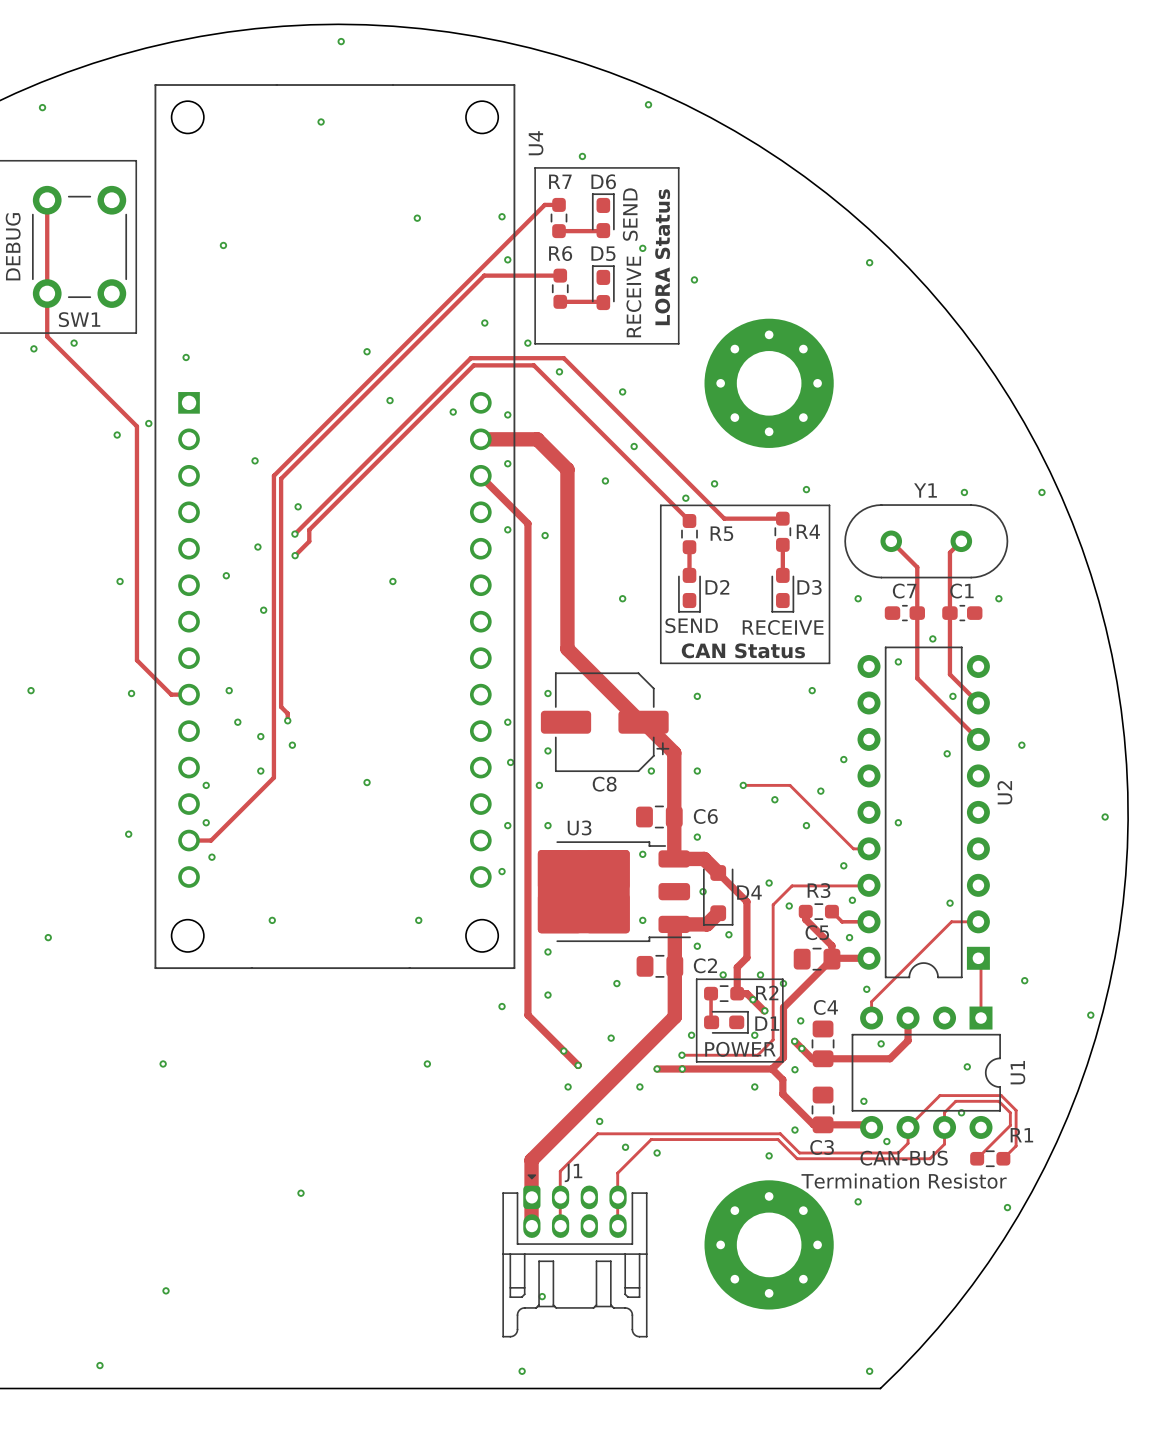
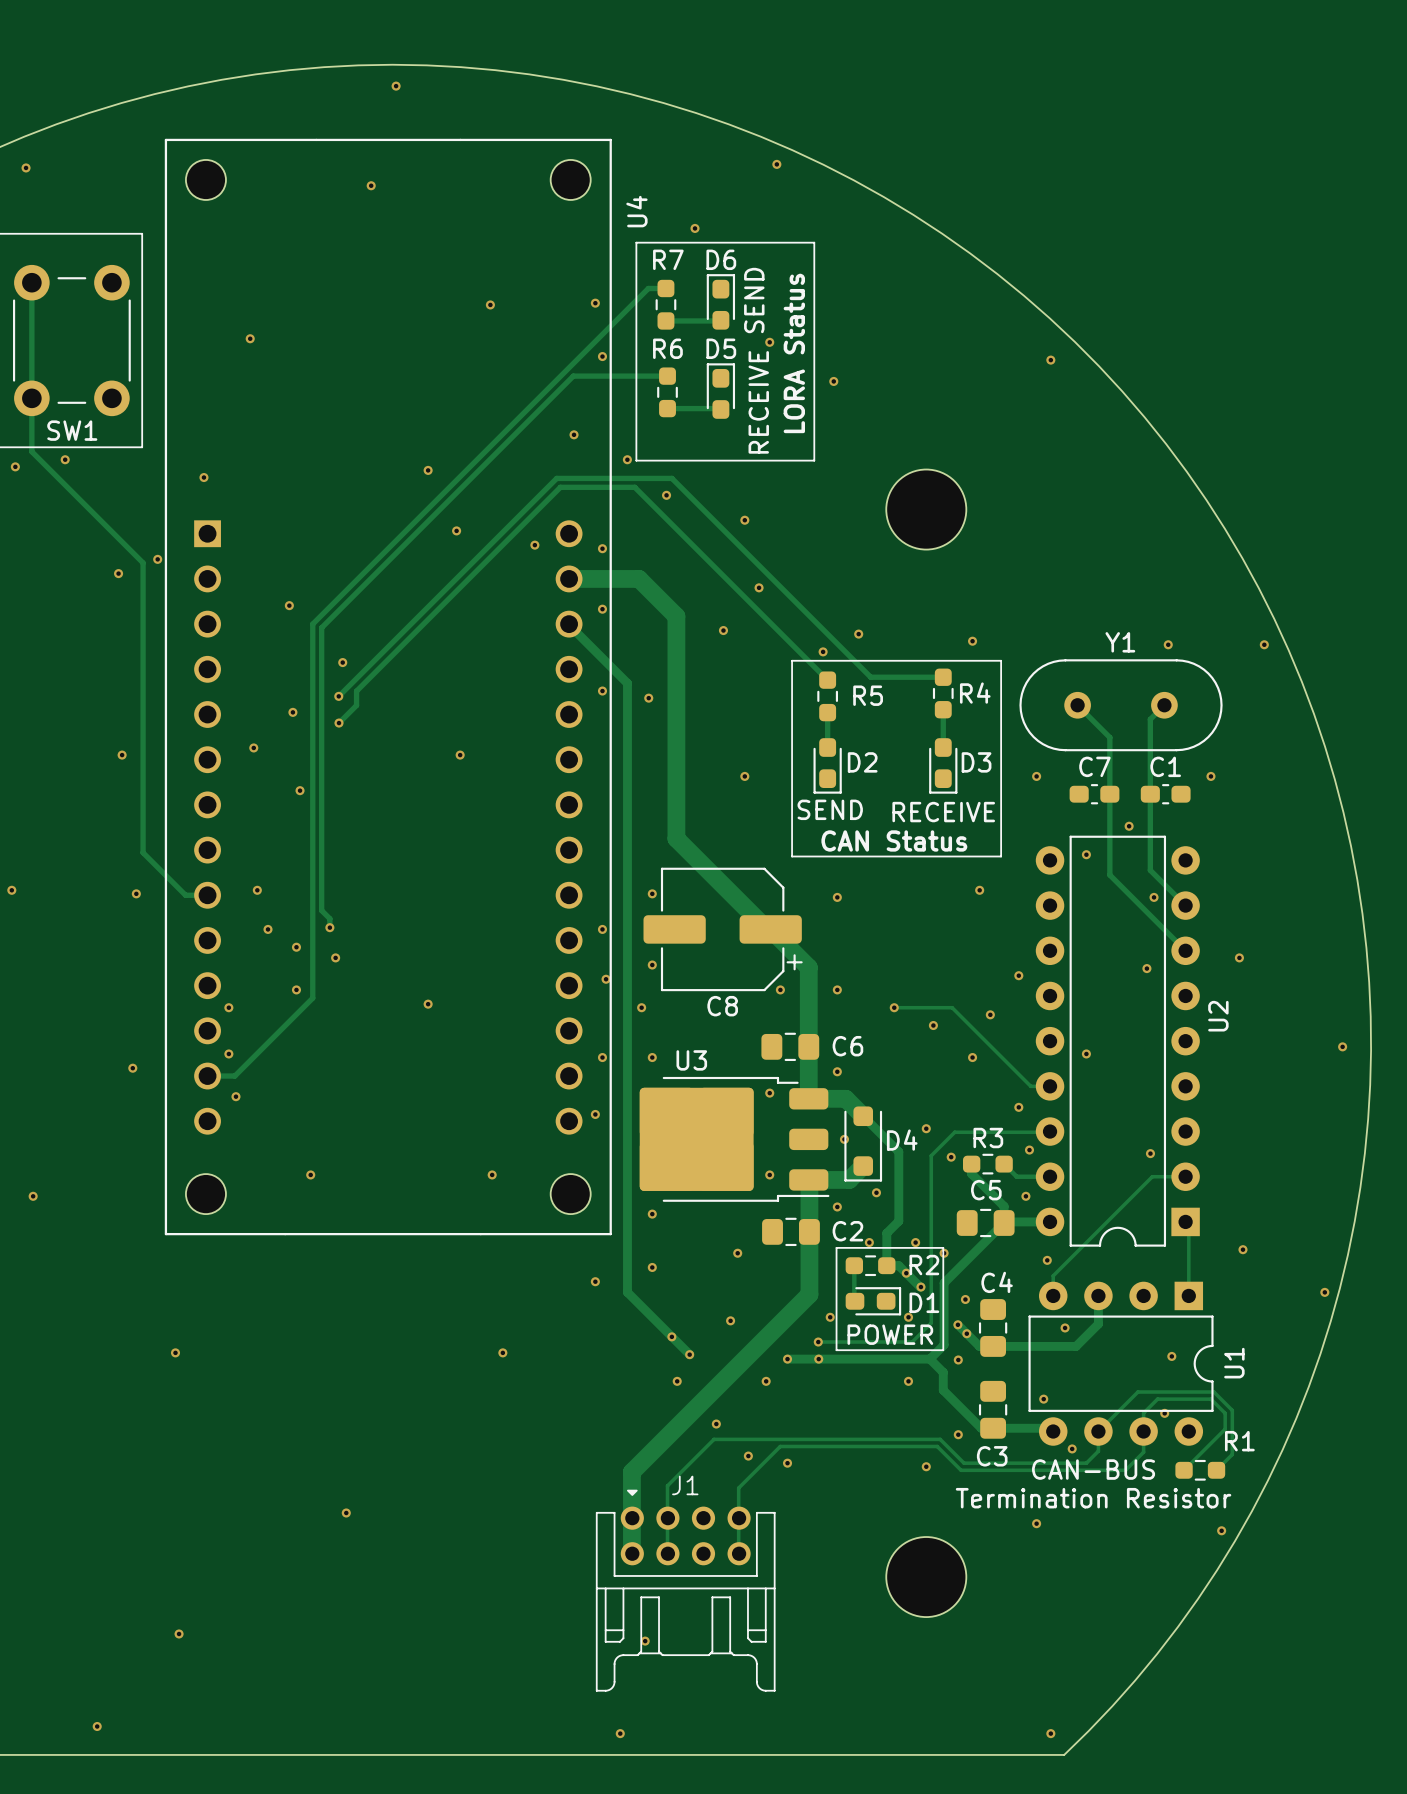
part footprint: [704, 318, 834, 448] -> [886, 469, 967, 550]
J1 footprint: [502, 1174, 648, 1338] -> [595, 1489, 776, 1692]
part footprint: [704, 1180, 834, 1310] -> [886, 1537, 967, 1618]

